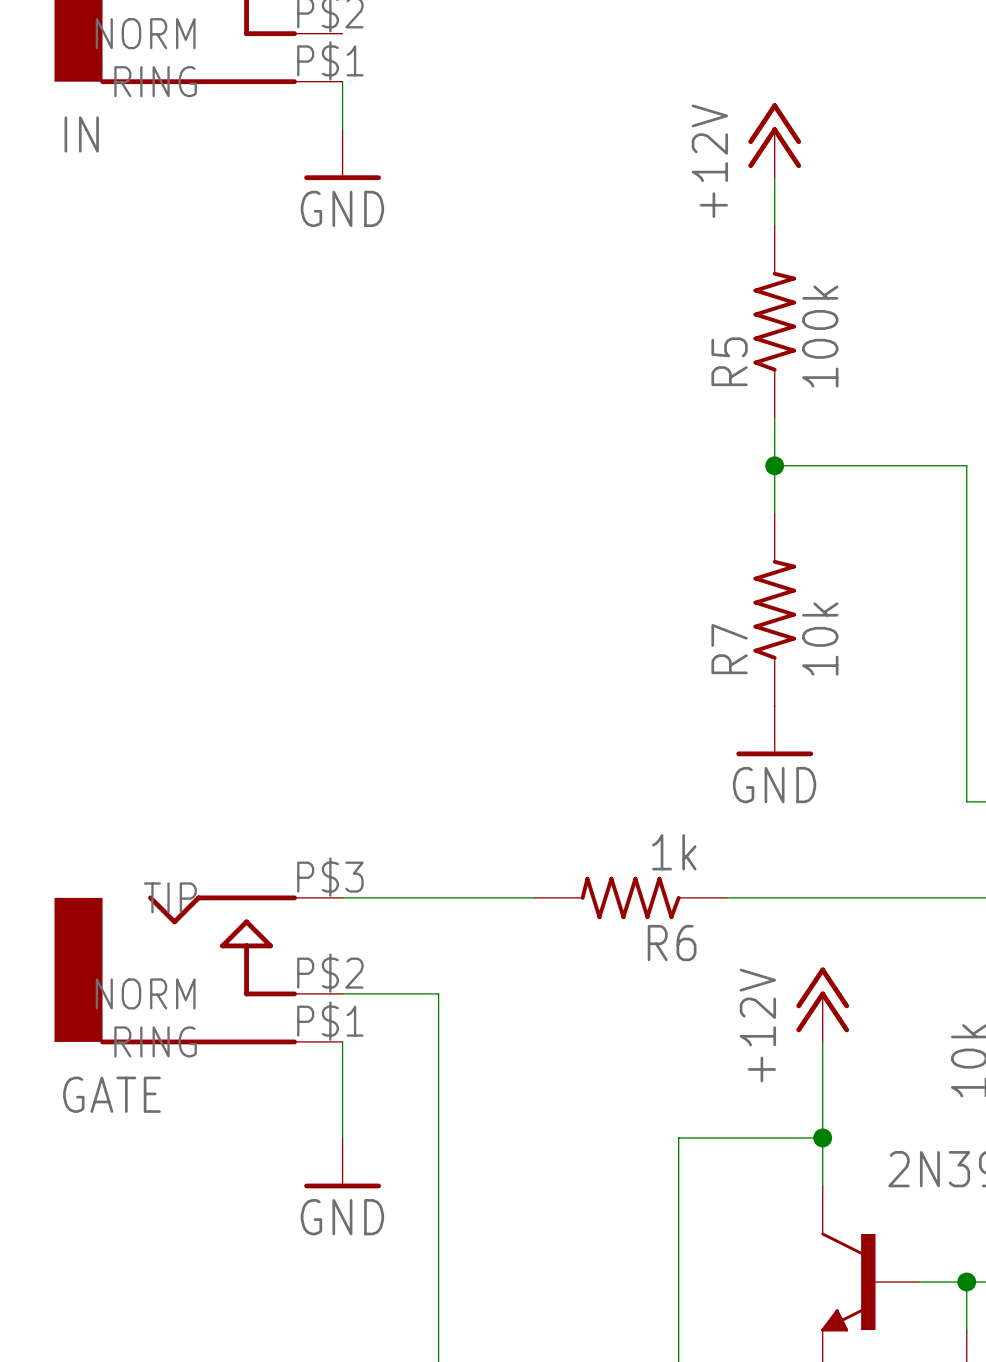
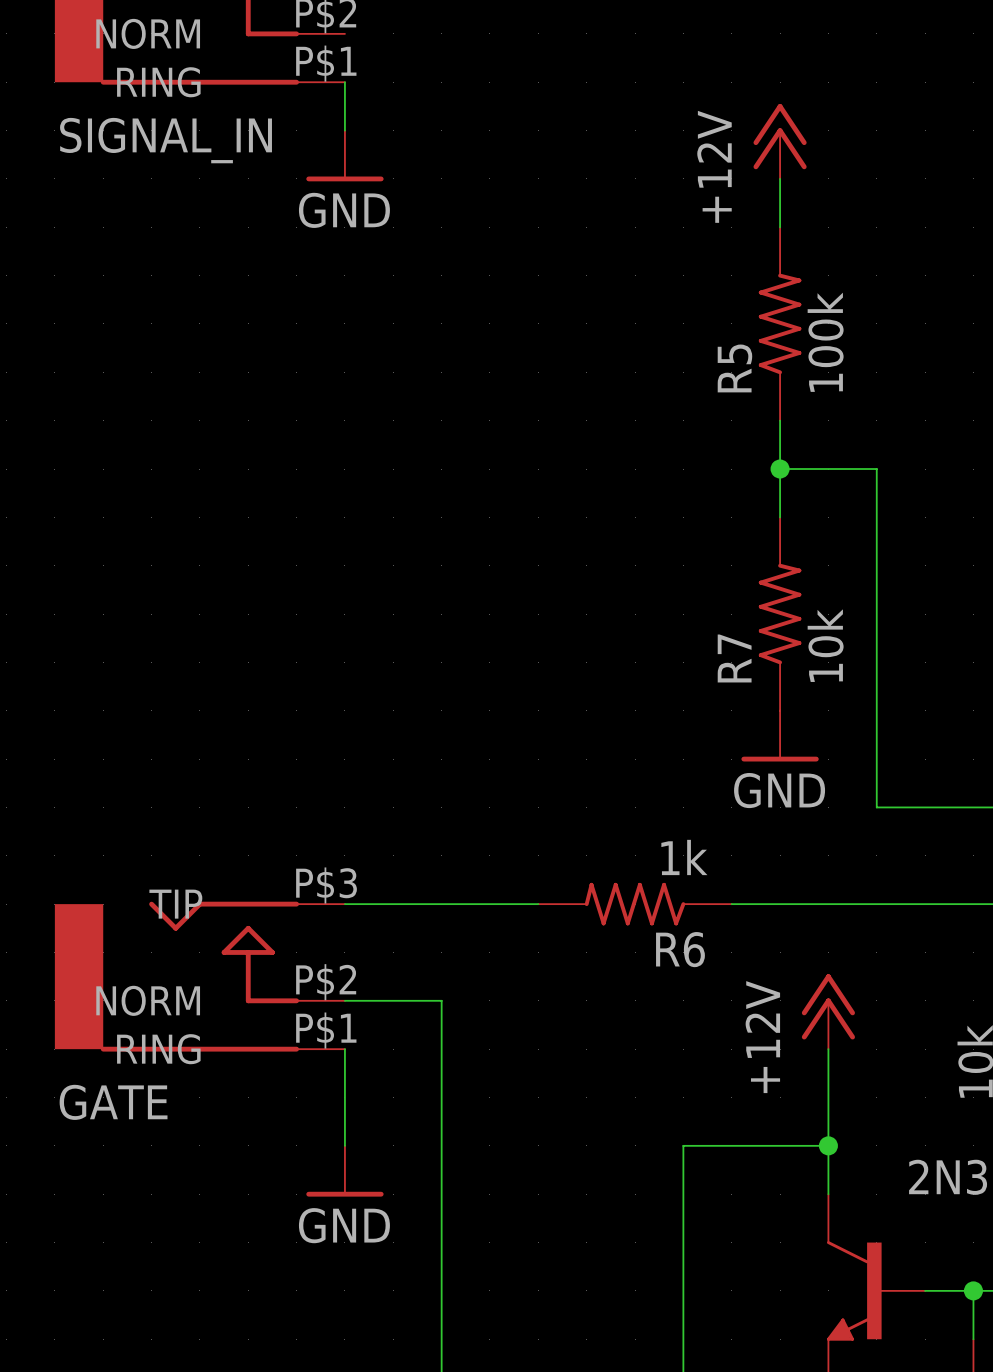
IN name: IN (81, 134) -> SIGNAL_IN (166, 140)
wire: (870, 465) (966, 465) (966, 801) -> (876, 469) (876, 807) (973, 807)

